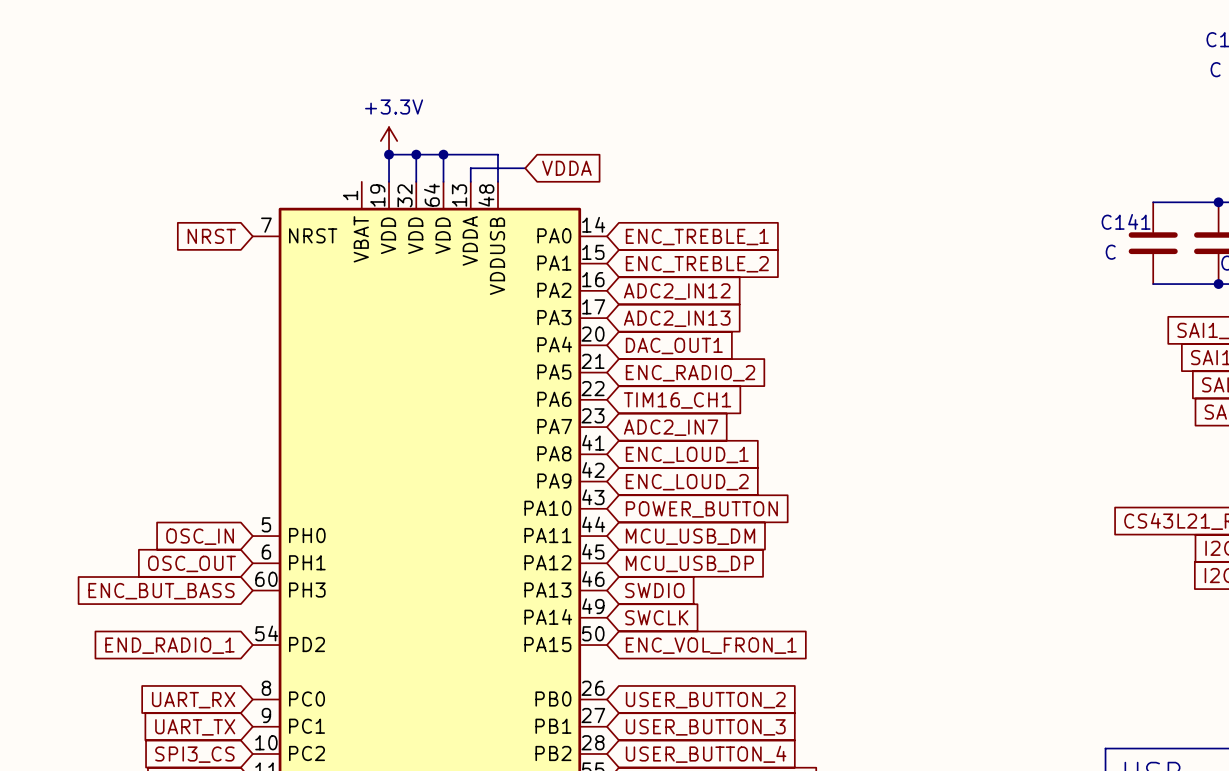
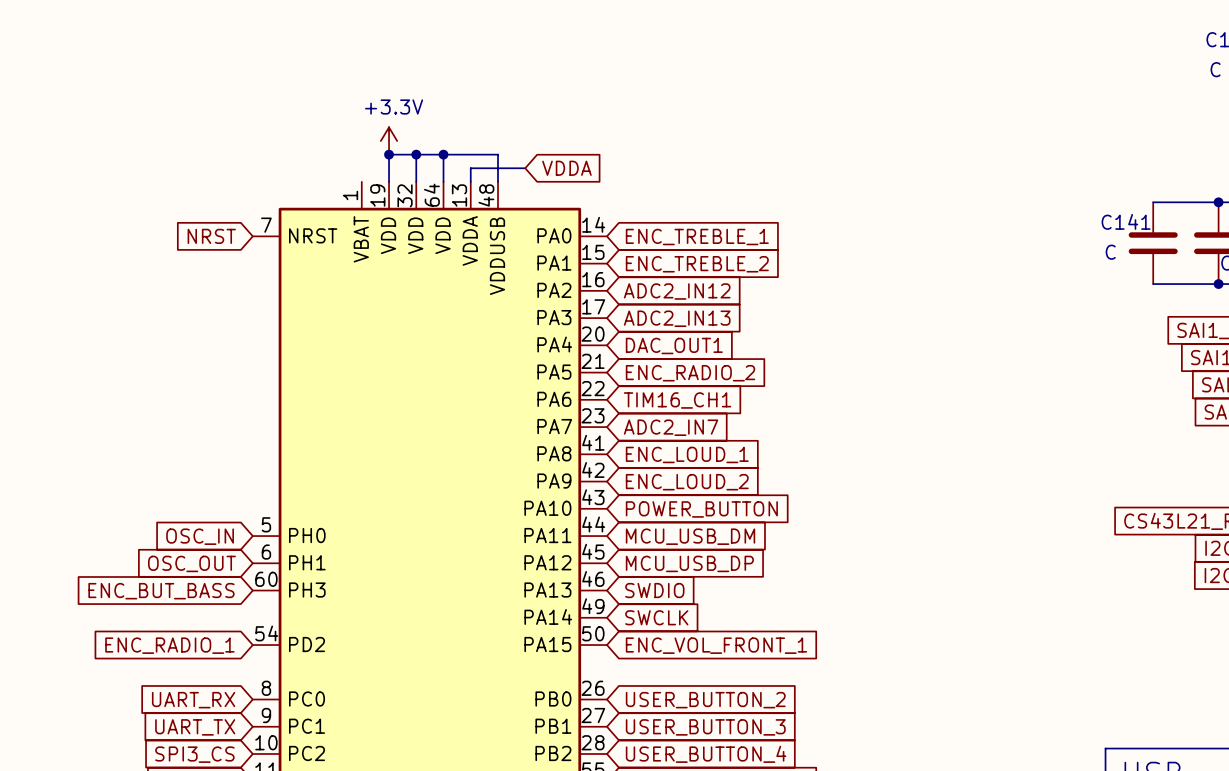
global label: END_RADIO_1 (169, 645) -> ENC_RADIO_1 (169, 645)
global label: ENC_VOL_FRON_1 (711, 645) -> ENC_VOL_FRONT_1 (716, 645)

